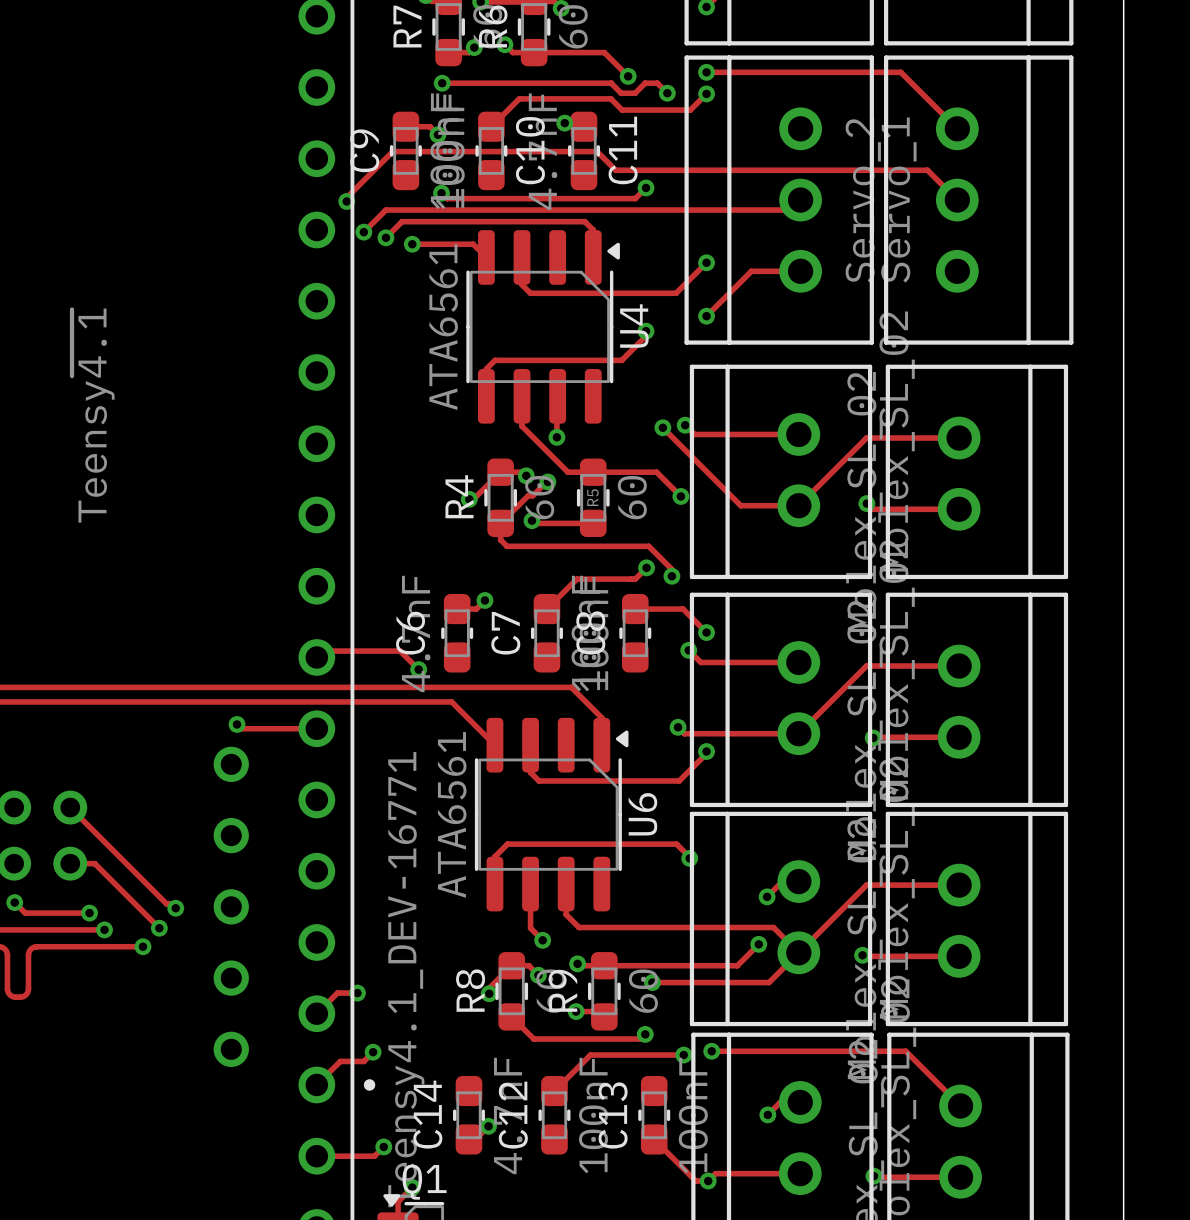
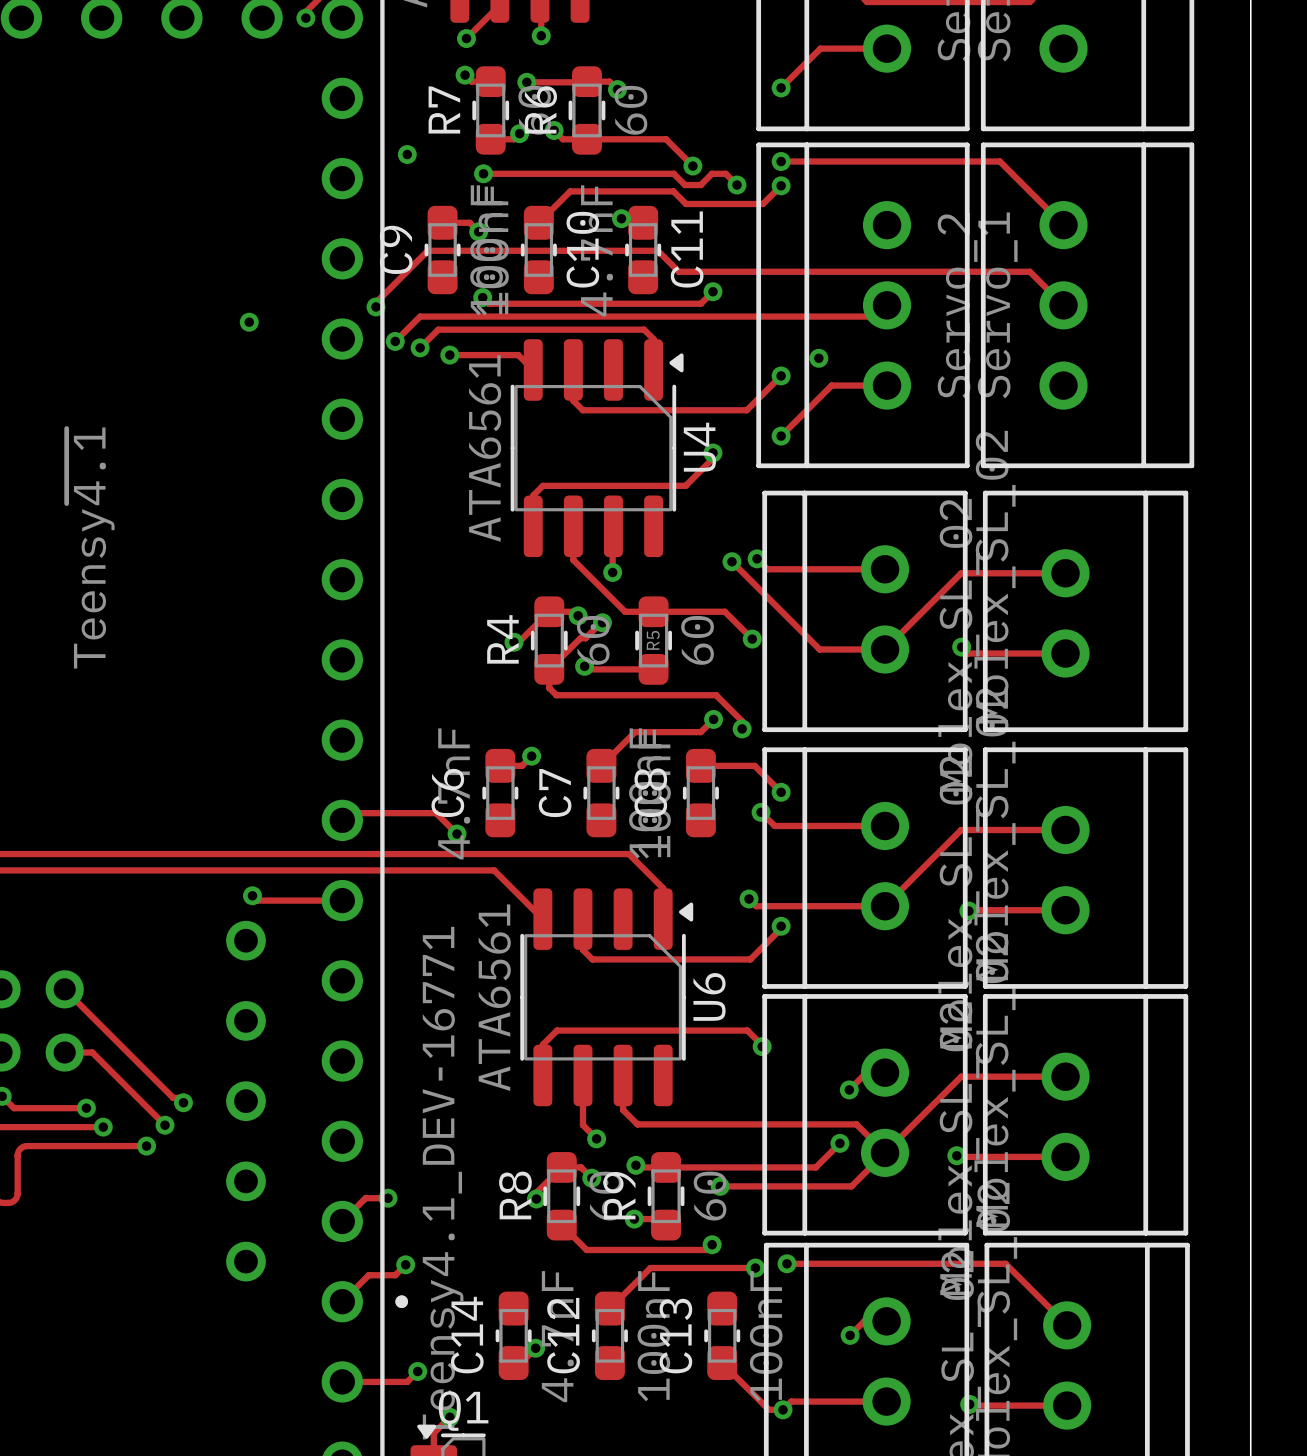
via: none -> (407, 154)
via: none -> (249, 322)
via: none -> (818, 358)

